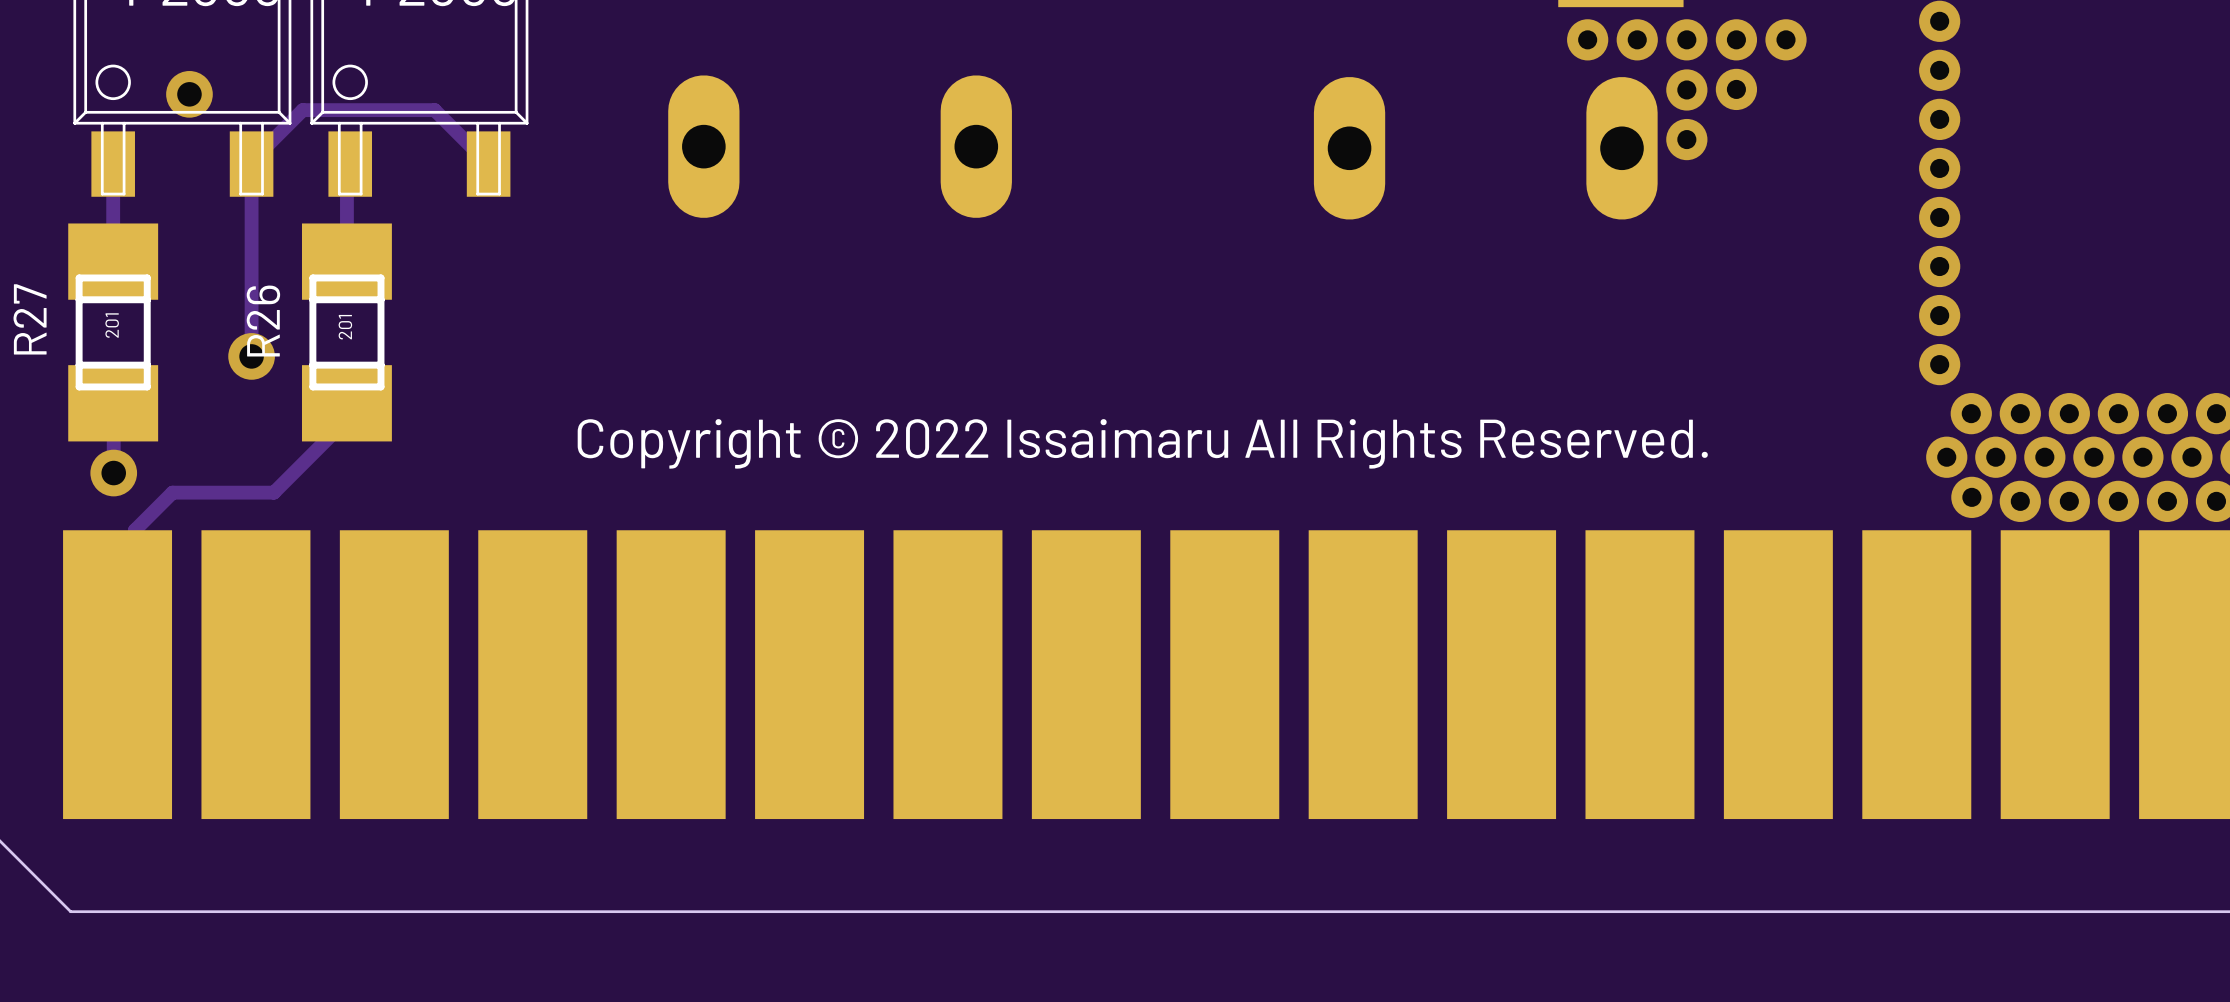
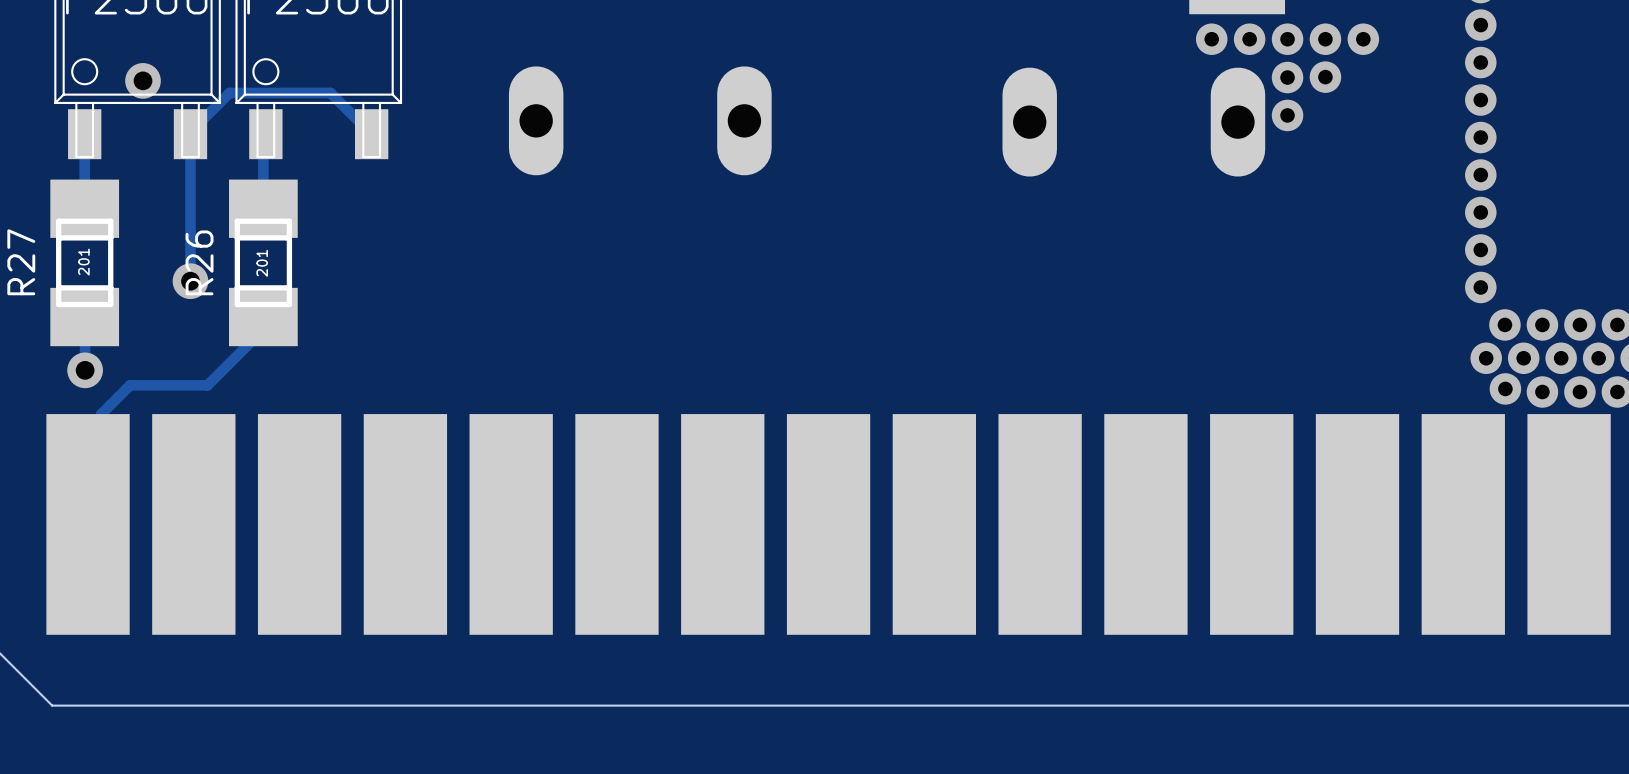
text: Copyright © 2022 Issaimaru All Rights Reserved. (1142, 443) -> none

